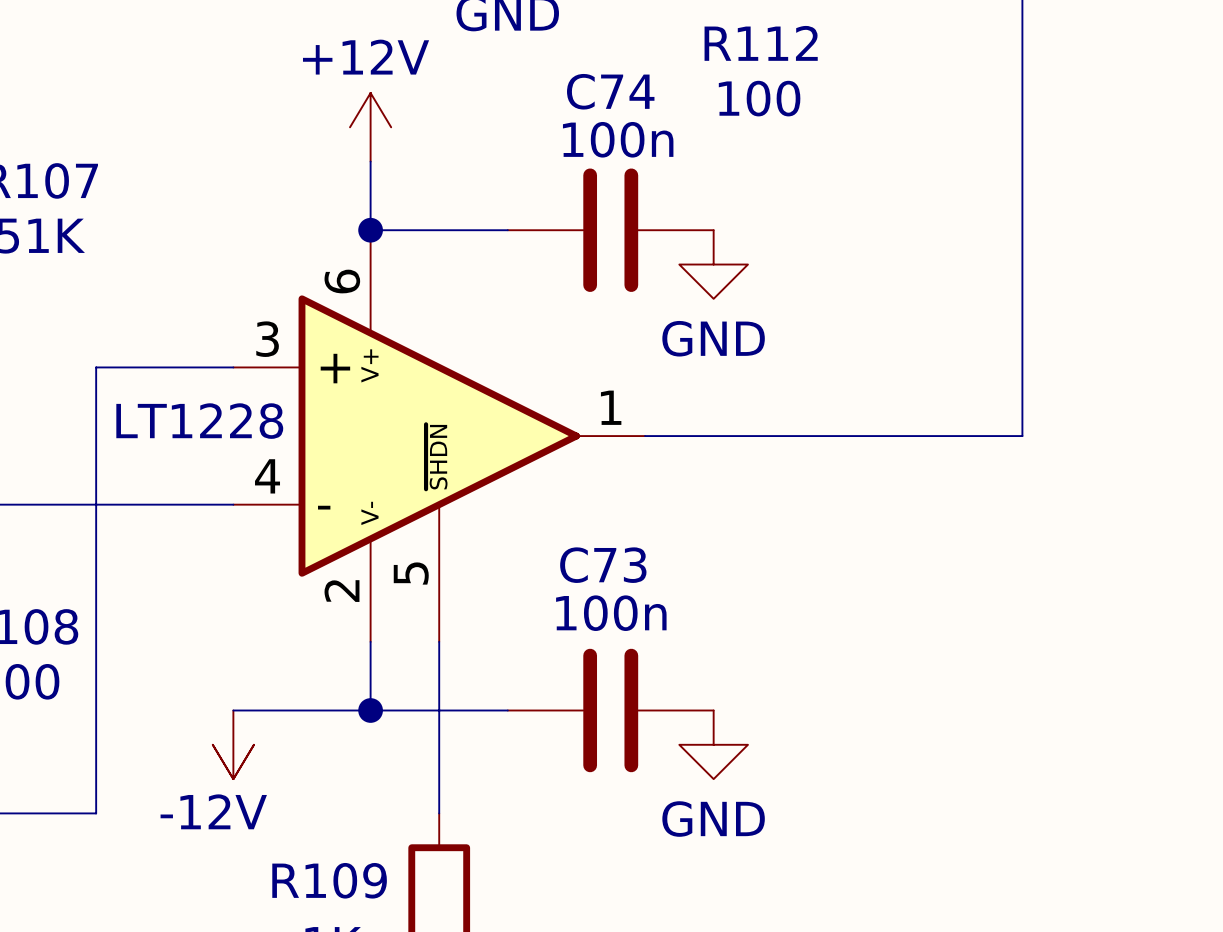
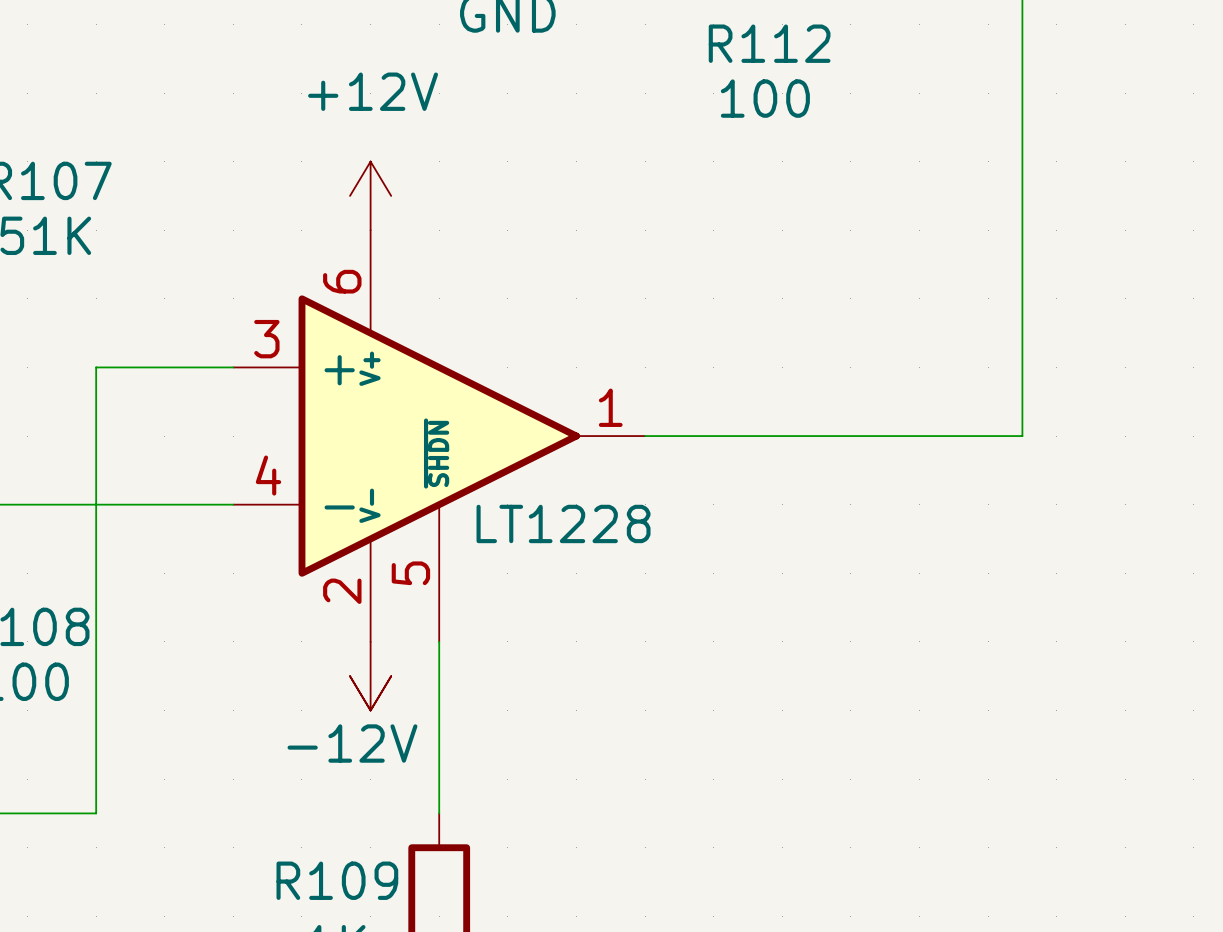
power symbol text position: +12V (366, 57) -> +12V (373, 91)
power symbol position: +12V (370, 127) -> +12V (370, 195)
wire: (370, 161) (370, 230) (507, 230) -> none
junction: (370, 230) -> none
C74: 100n (610, 230) -> none
power symbol: GND (713, 264) -> none
part value position: LT1228 (199, 421) -> LT1228 (563, 523)
wire: (233, 710) (507, 710) -> none
junction: (370, 710) -> none
C73: 100n (610, 710) -> none
power symbol position: -12V (233, 744) -> -12V (370, 676)
power symbol: GND (713, 744) -> none

